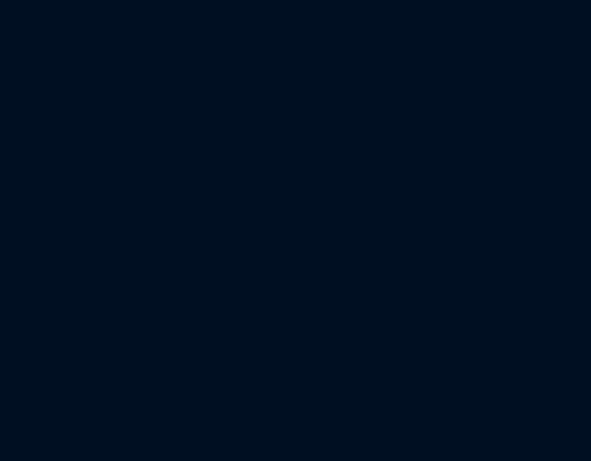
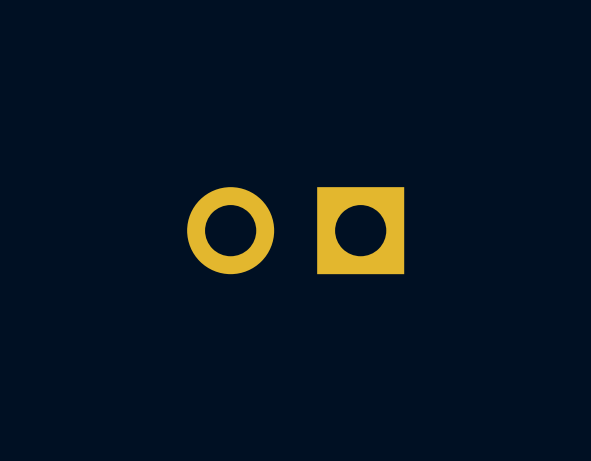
part: none -> (295, 230)

